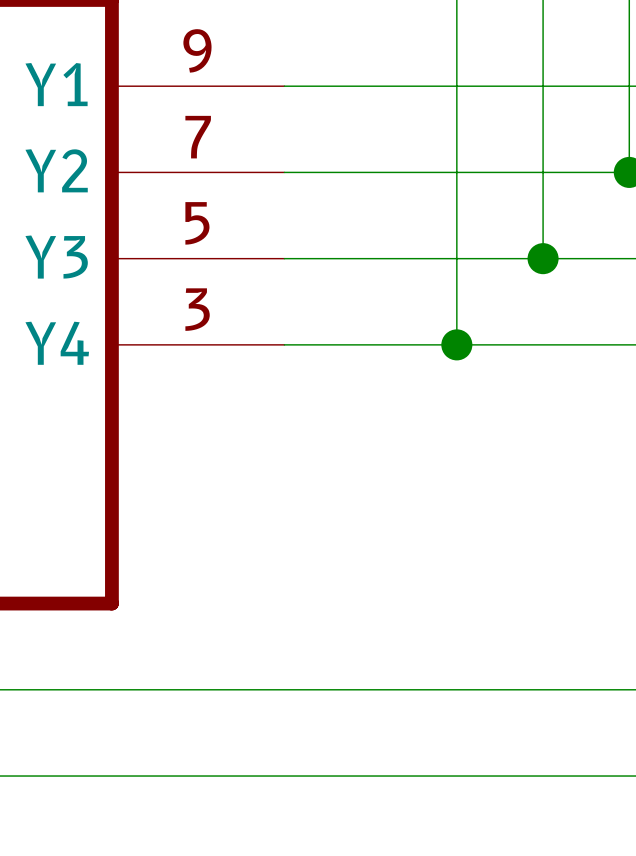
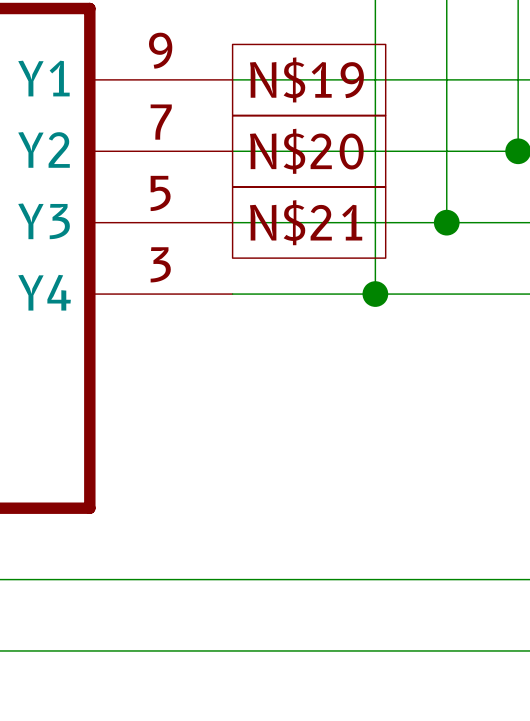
global label: none -> N$19 (306, 79)
global label: none -> N$20 (306, 151)
global label: none -> N$21 (306, 222)

